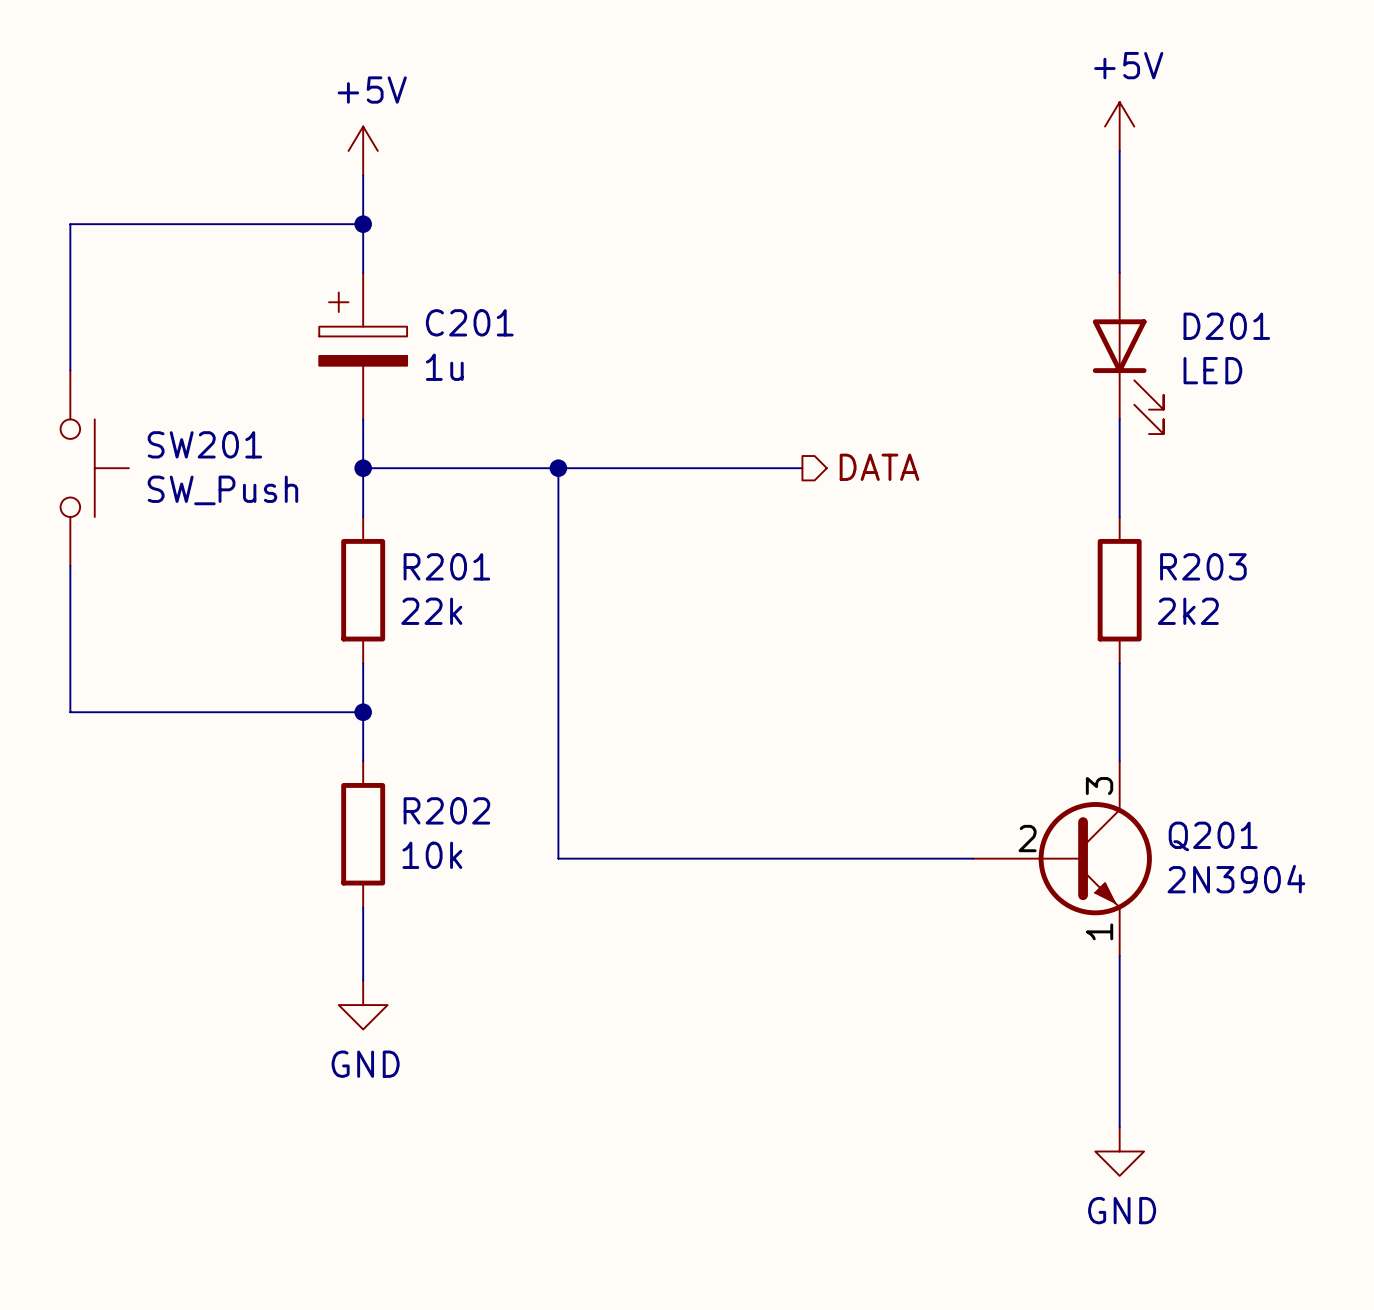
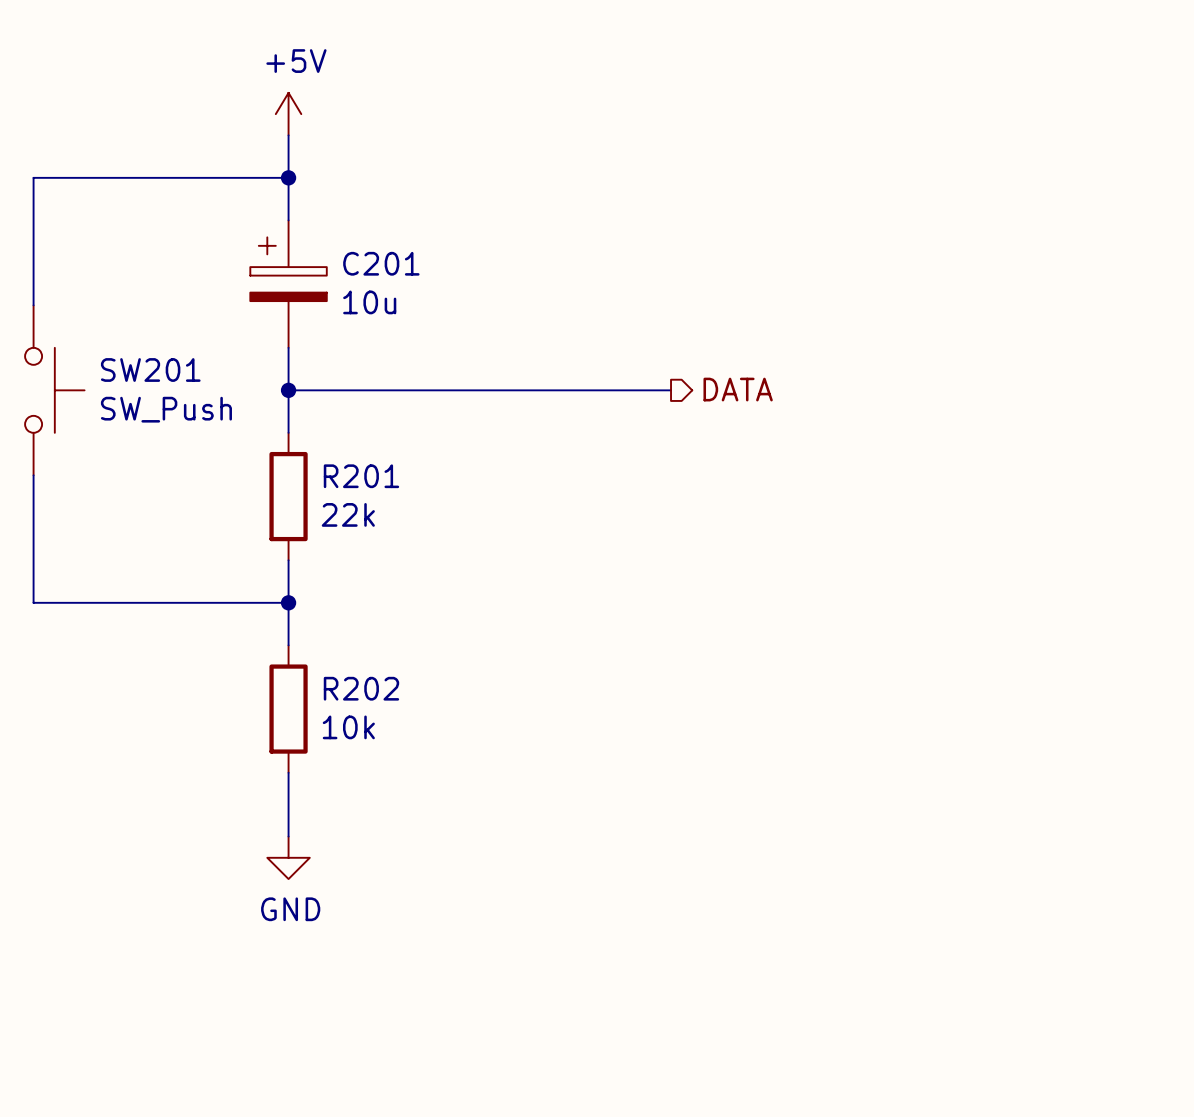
power symbol: +5V (1119, 126) -> none
wire: (1119, 150) (1119, 272) -> none
D201: LED (1128, 353) -> none
C201 value: 1u (444, 367) -> 10u (369, 302)
wire: (1119, 419) (1119, 517) -> none
wire: (558, 468) (558, 858) (973, 858) -> none
junction: (558, 468) -> none
R203: 2k2 (1119, 590) -> none
wire: (1119, 663) (1119, 761) -> none
Q201: 2N3904 (1062, 858) -> none
wire: (1119, 956) (1119, 1127) -> none
power symbol: GND (1119, 1151) -> none

